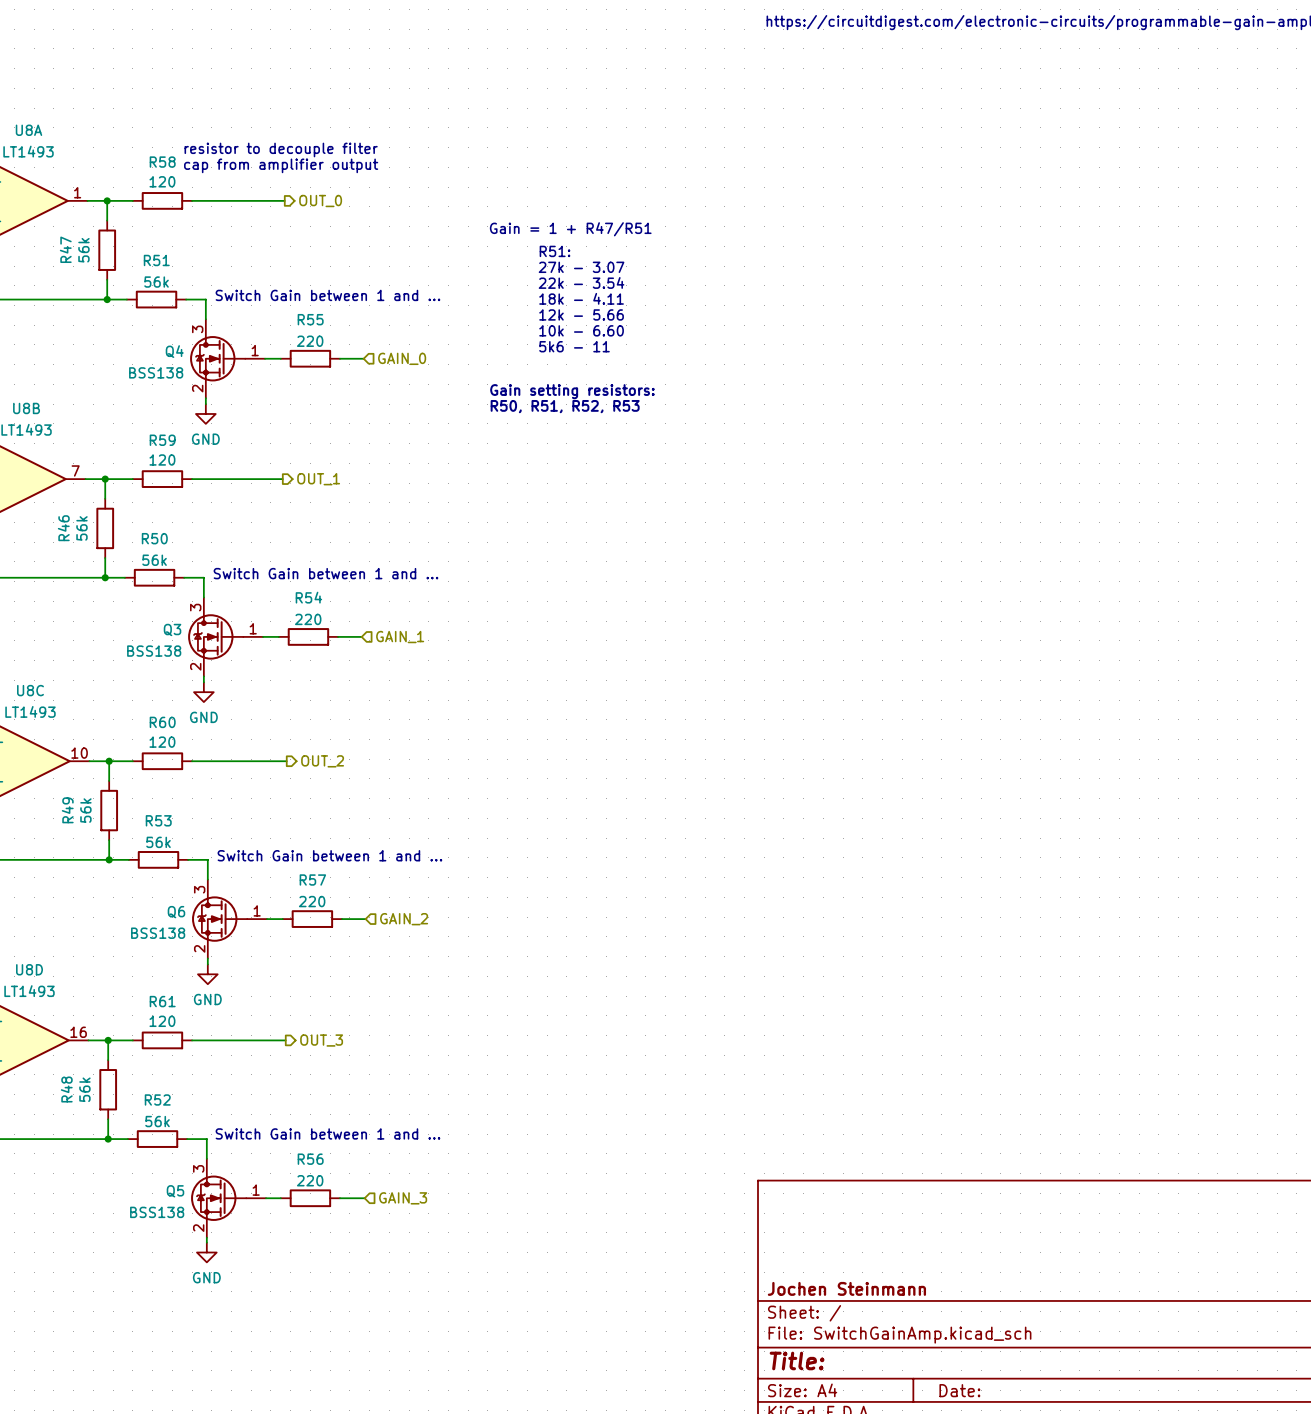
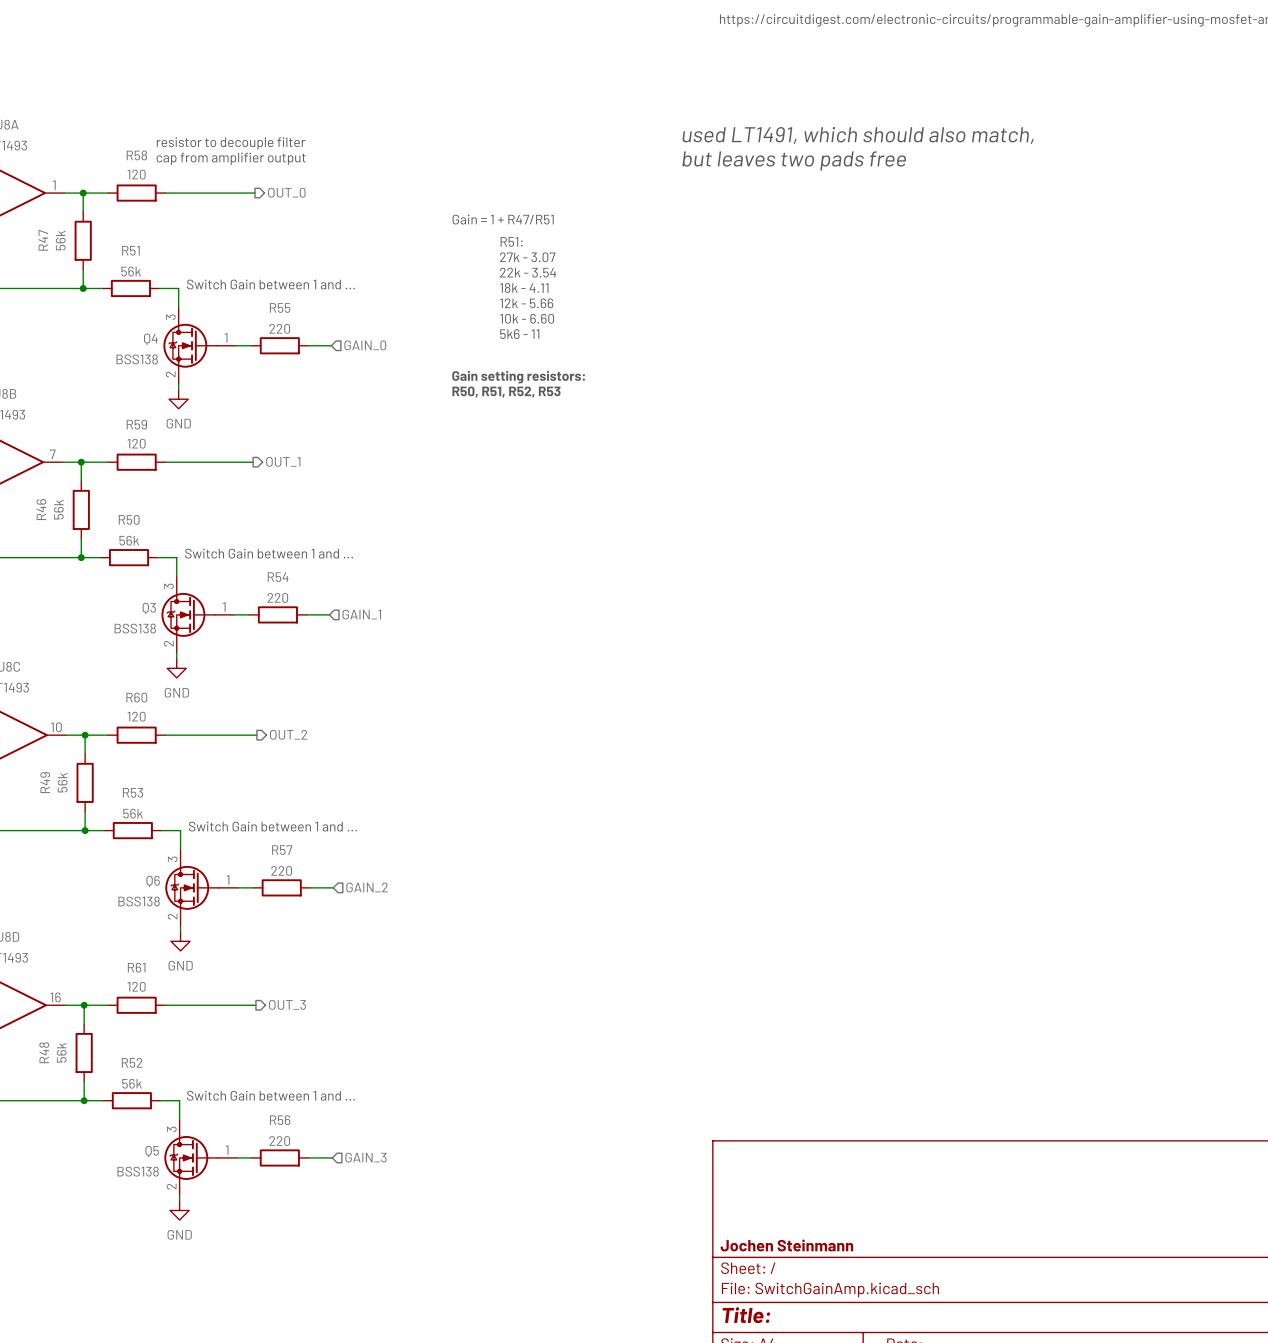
text: none -> used LT1491, which should also match, (858, 135)
text: none -> but leaves two pads free (794, 160)

